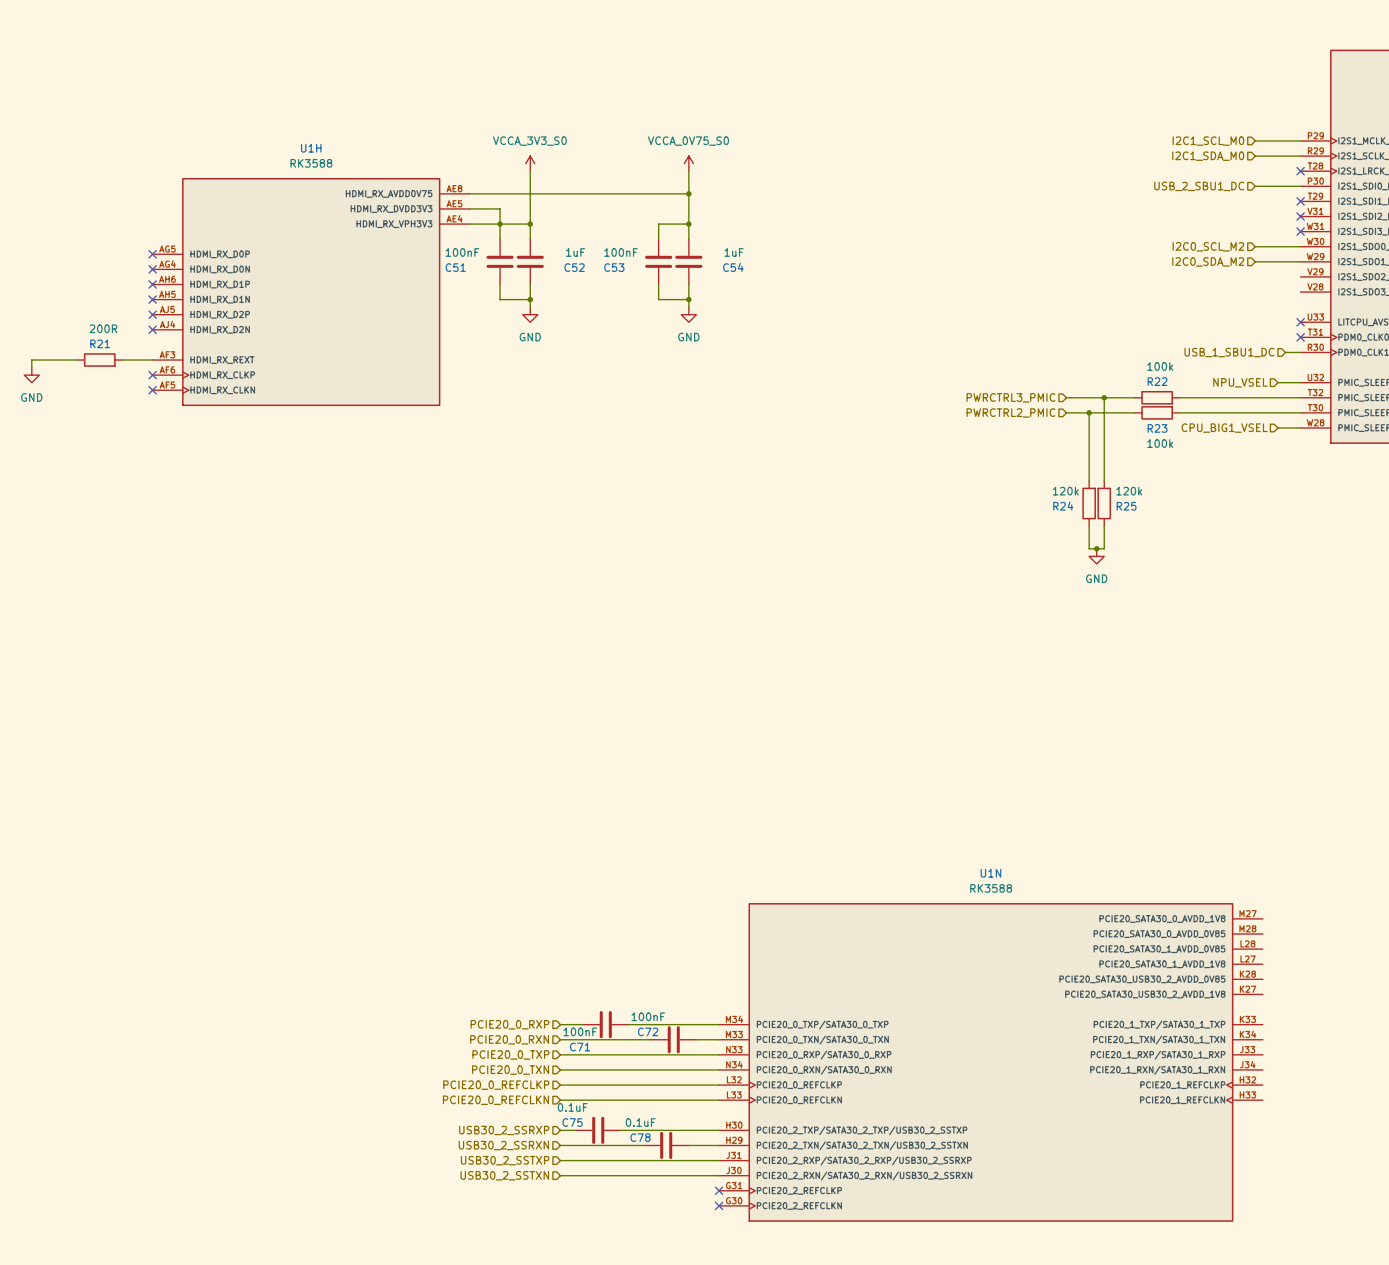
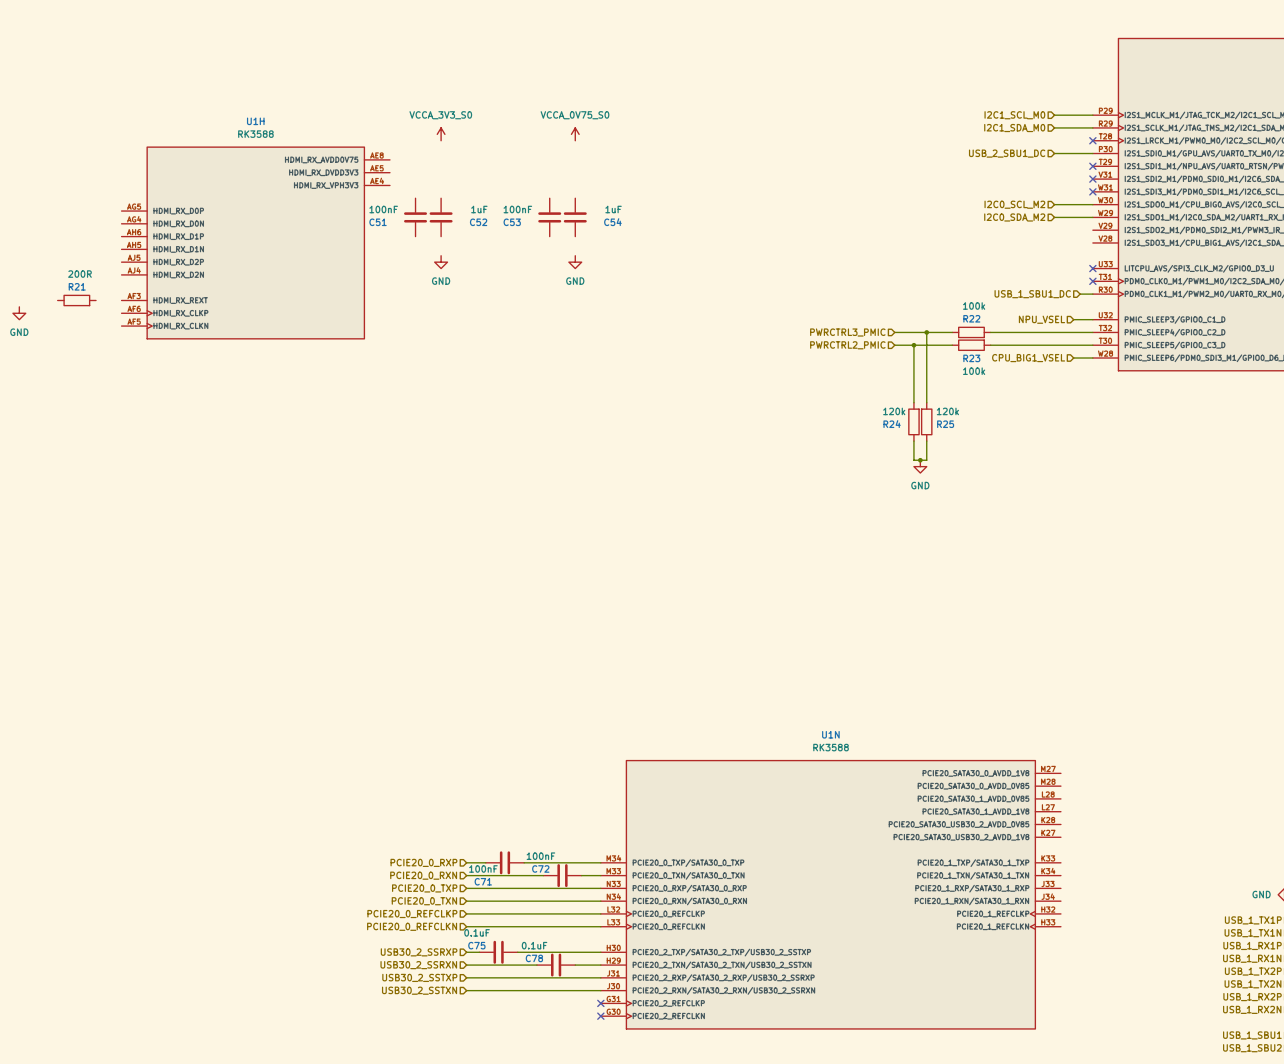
wire: (530, 171) (530, 239) -> none
wire: (688, 171) (688, 239) -> none
wire: (469, 193) (688, 193) -> none
junction: (688, 193) -> none
wire: (469, 208) (500, 208) (500, 239) -> none
wire: (469, 224) (530, 224) -> none
junction: (500, 224) -> none
junction: (530, 224) -> none
wire: (688, 224) (658, 224) (658, 239) -> none
junction: (688, 224) -> none
no-connect mark: (152, 254) -> none
no-connect mark: (152, 269) -> none
no-connect mark: (152, 284) -> none
wire: (500, 284) (500, 299) (530, 299) -> none
wire: (530, 284) (530, 307) -> none
wire: (658, 284) (658, 299) (688, 299) -> none
wire: (688, 284) (688, 307) -> none
no-connect mark: (152, 299) -> none
junction: (530, 299) -> none
junction: (688, 299) -> none
no-connect mark: (152, 314) -> none
no-connect mark: (152, 329) -> none
wire: (77, 360) (31, 360) (31, 367) -> none
wire: (122, 360) (152, 360) -> none
no-connect mark: (152, 375) -> none
no-connect mark: (152, 390) -> none

